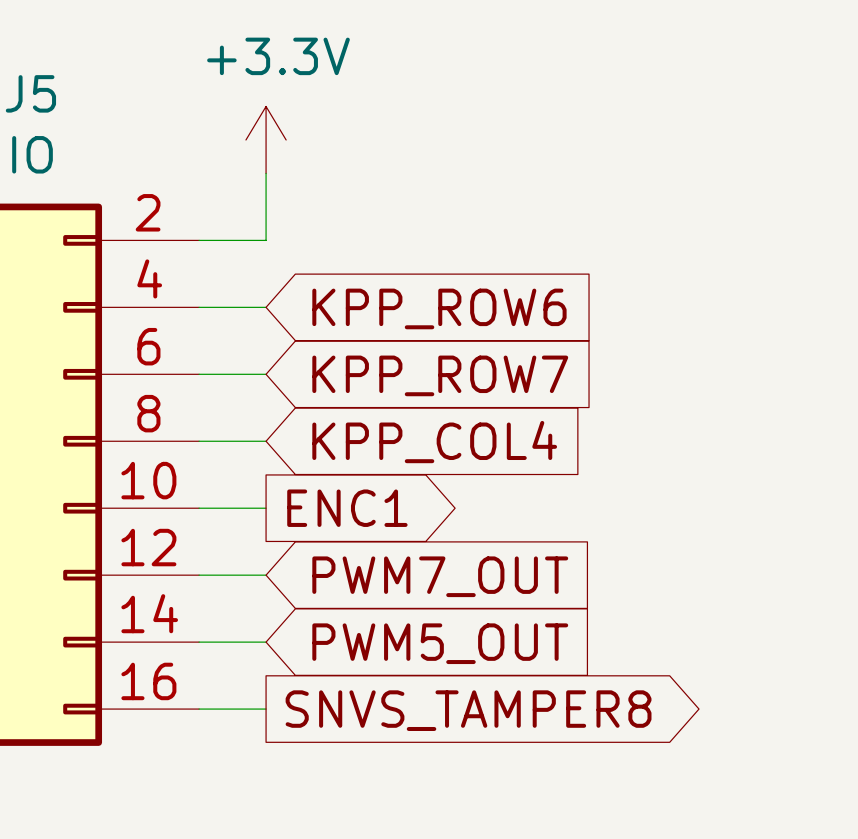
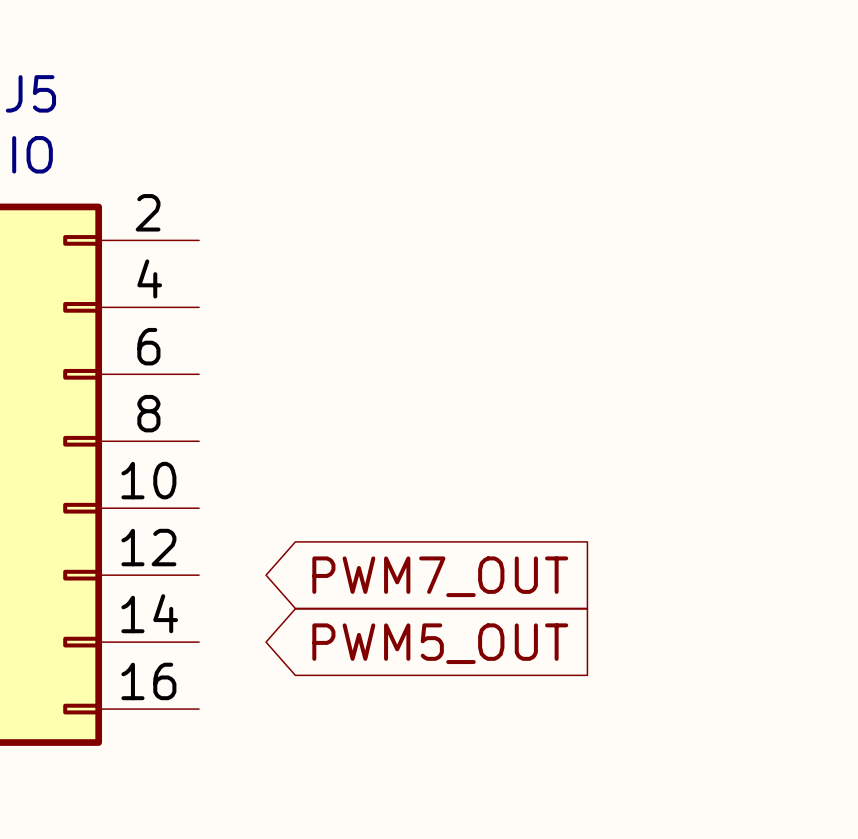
power symbol: +3.3V (266, 139) -> none
wire: (266, 173) (266, 240) (199, 240) -> none
wire: (199, 307) (266, 307) -> none
global label: KPP_ROW6 (439, 308) -> none
wire: (199, 374) (266, 374) -> none
global label: KPP_ROW7 (440, 375) -> none
wire: (199, 441) (266, 441) -> none
global label: KPP_COL4 (434, 442) -> none
wire: (199, 508) (266, 508) -> none
global label: ENC1 (347, 508) -> none
wire: (199, 575) (266, 575) -> none
wire: (199, 642) (266, 642) -> none
wire: (199, 709) (266, 709) -> none
global label: SNVS_TAMPER8 (468, 710) -> none

